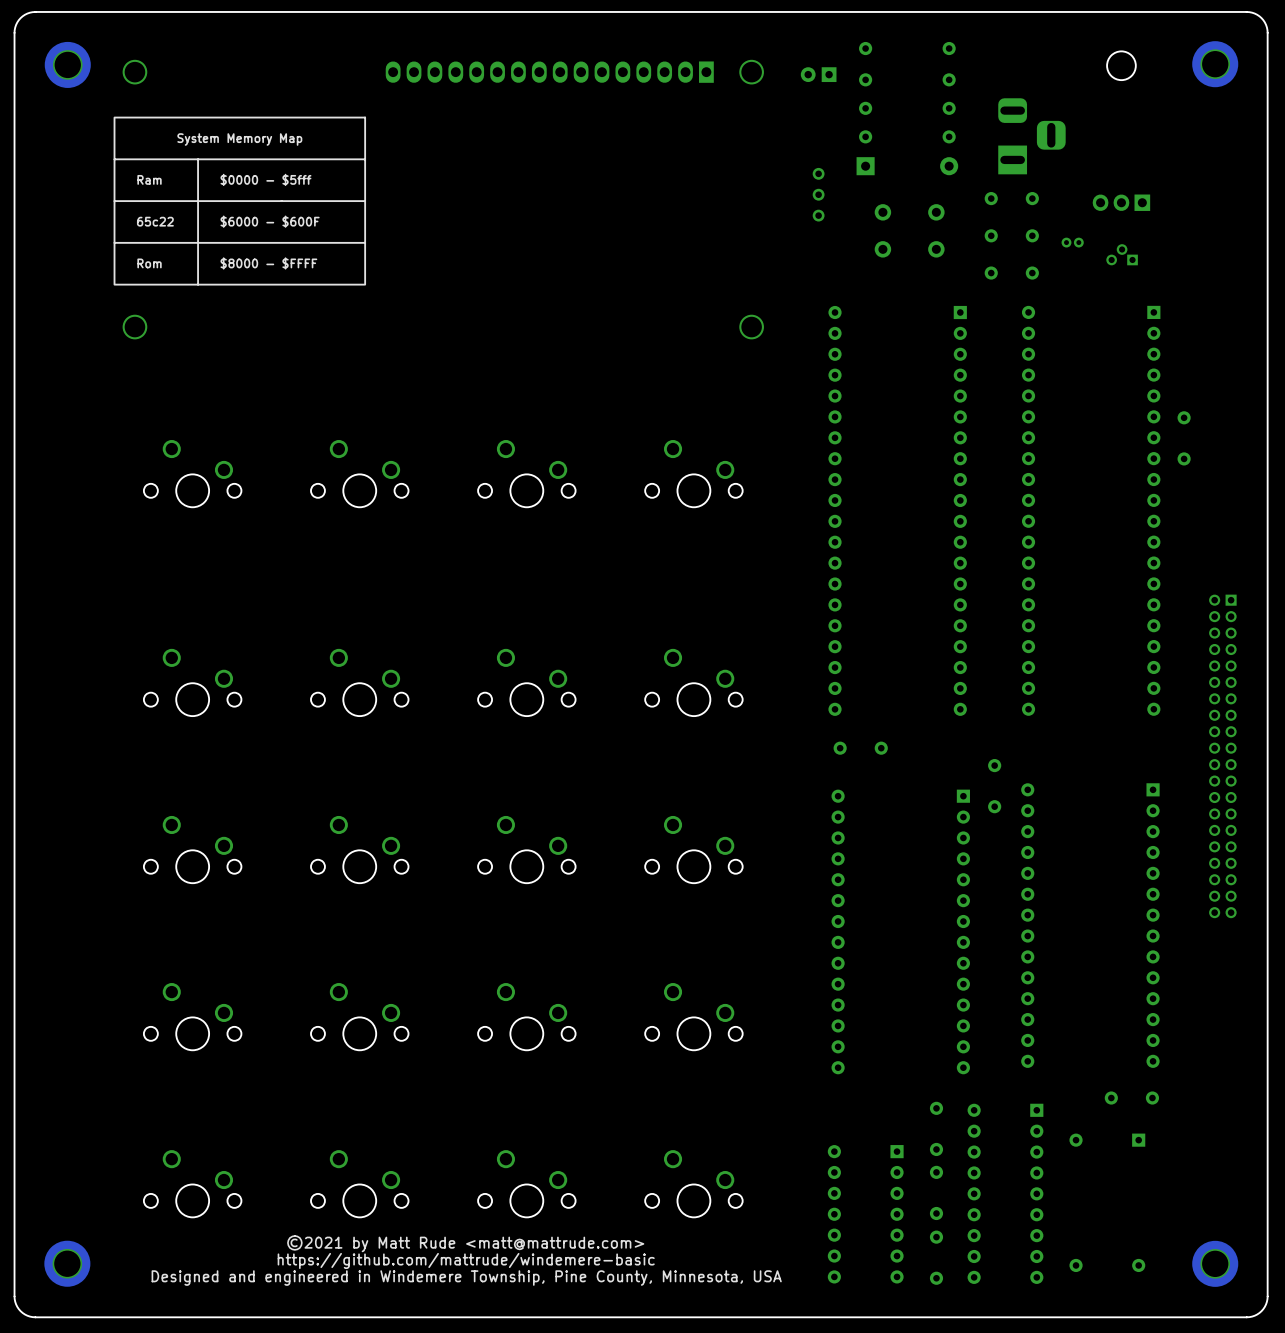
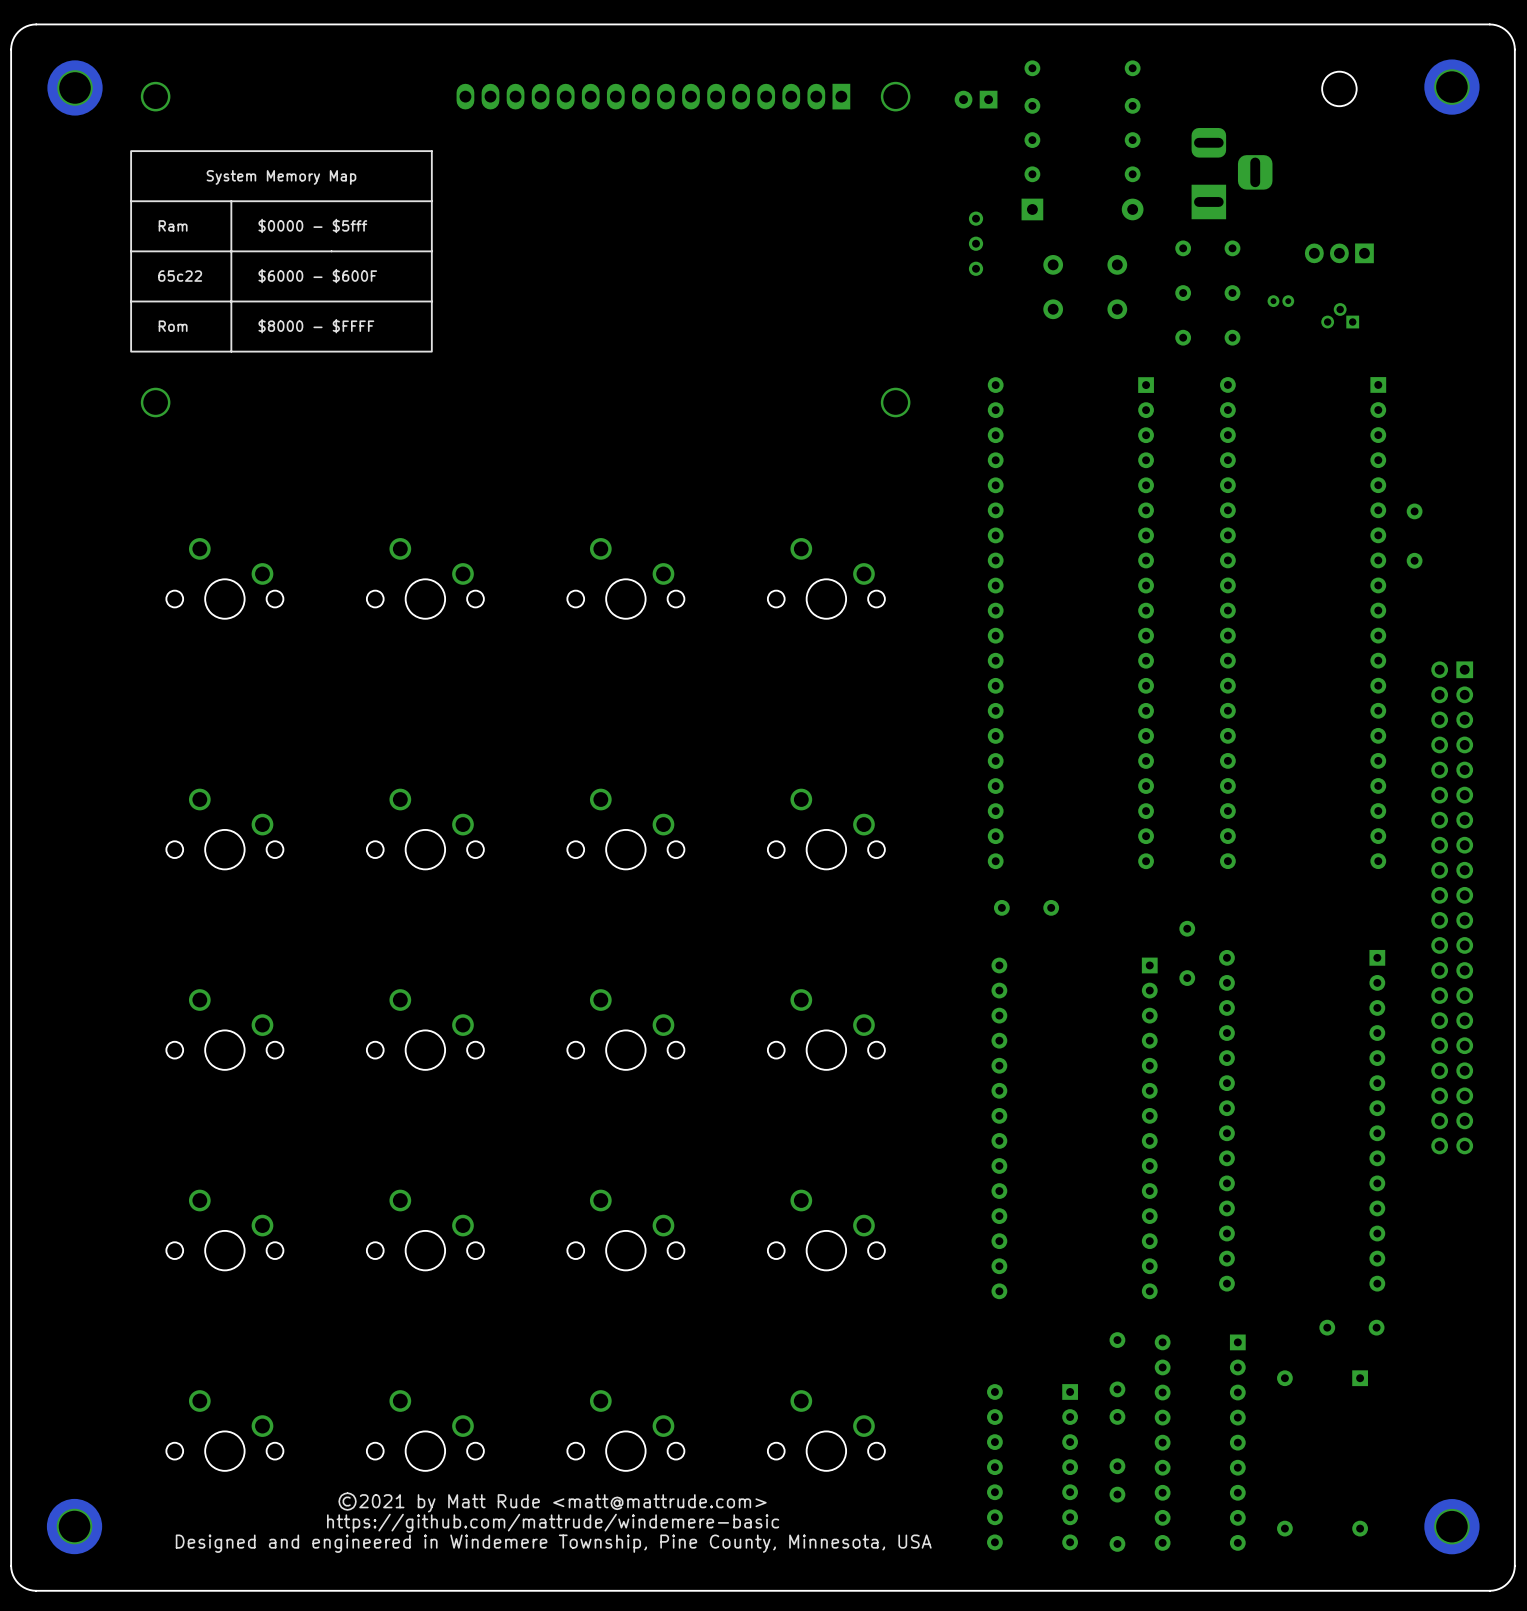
part: none -> (1452, 907)
part: (1222, 756) -> none

